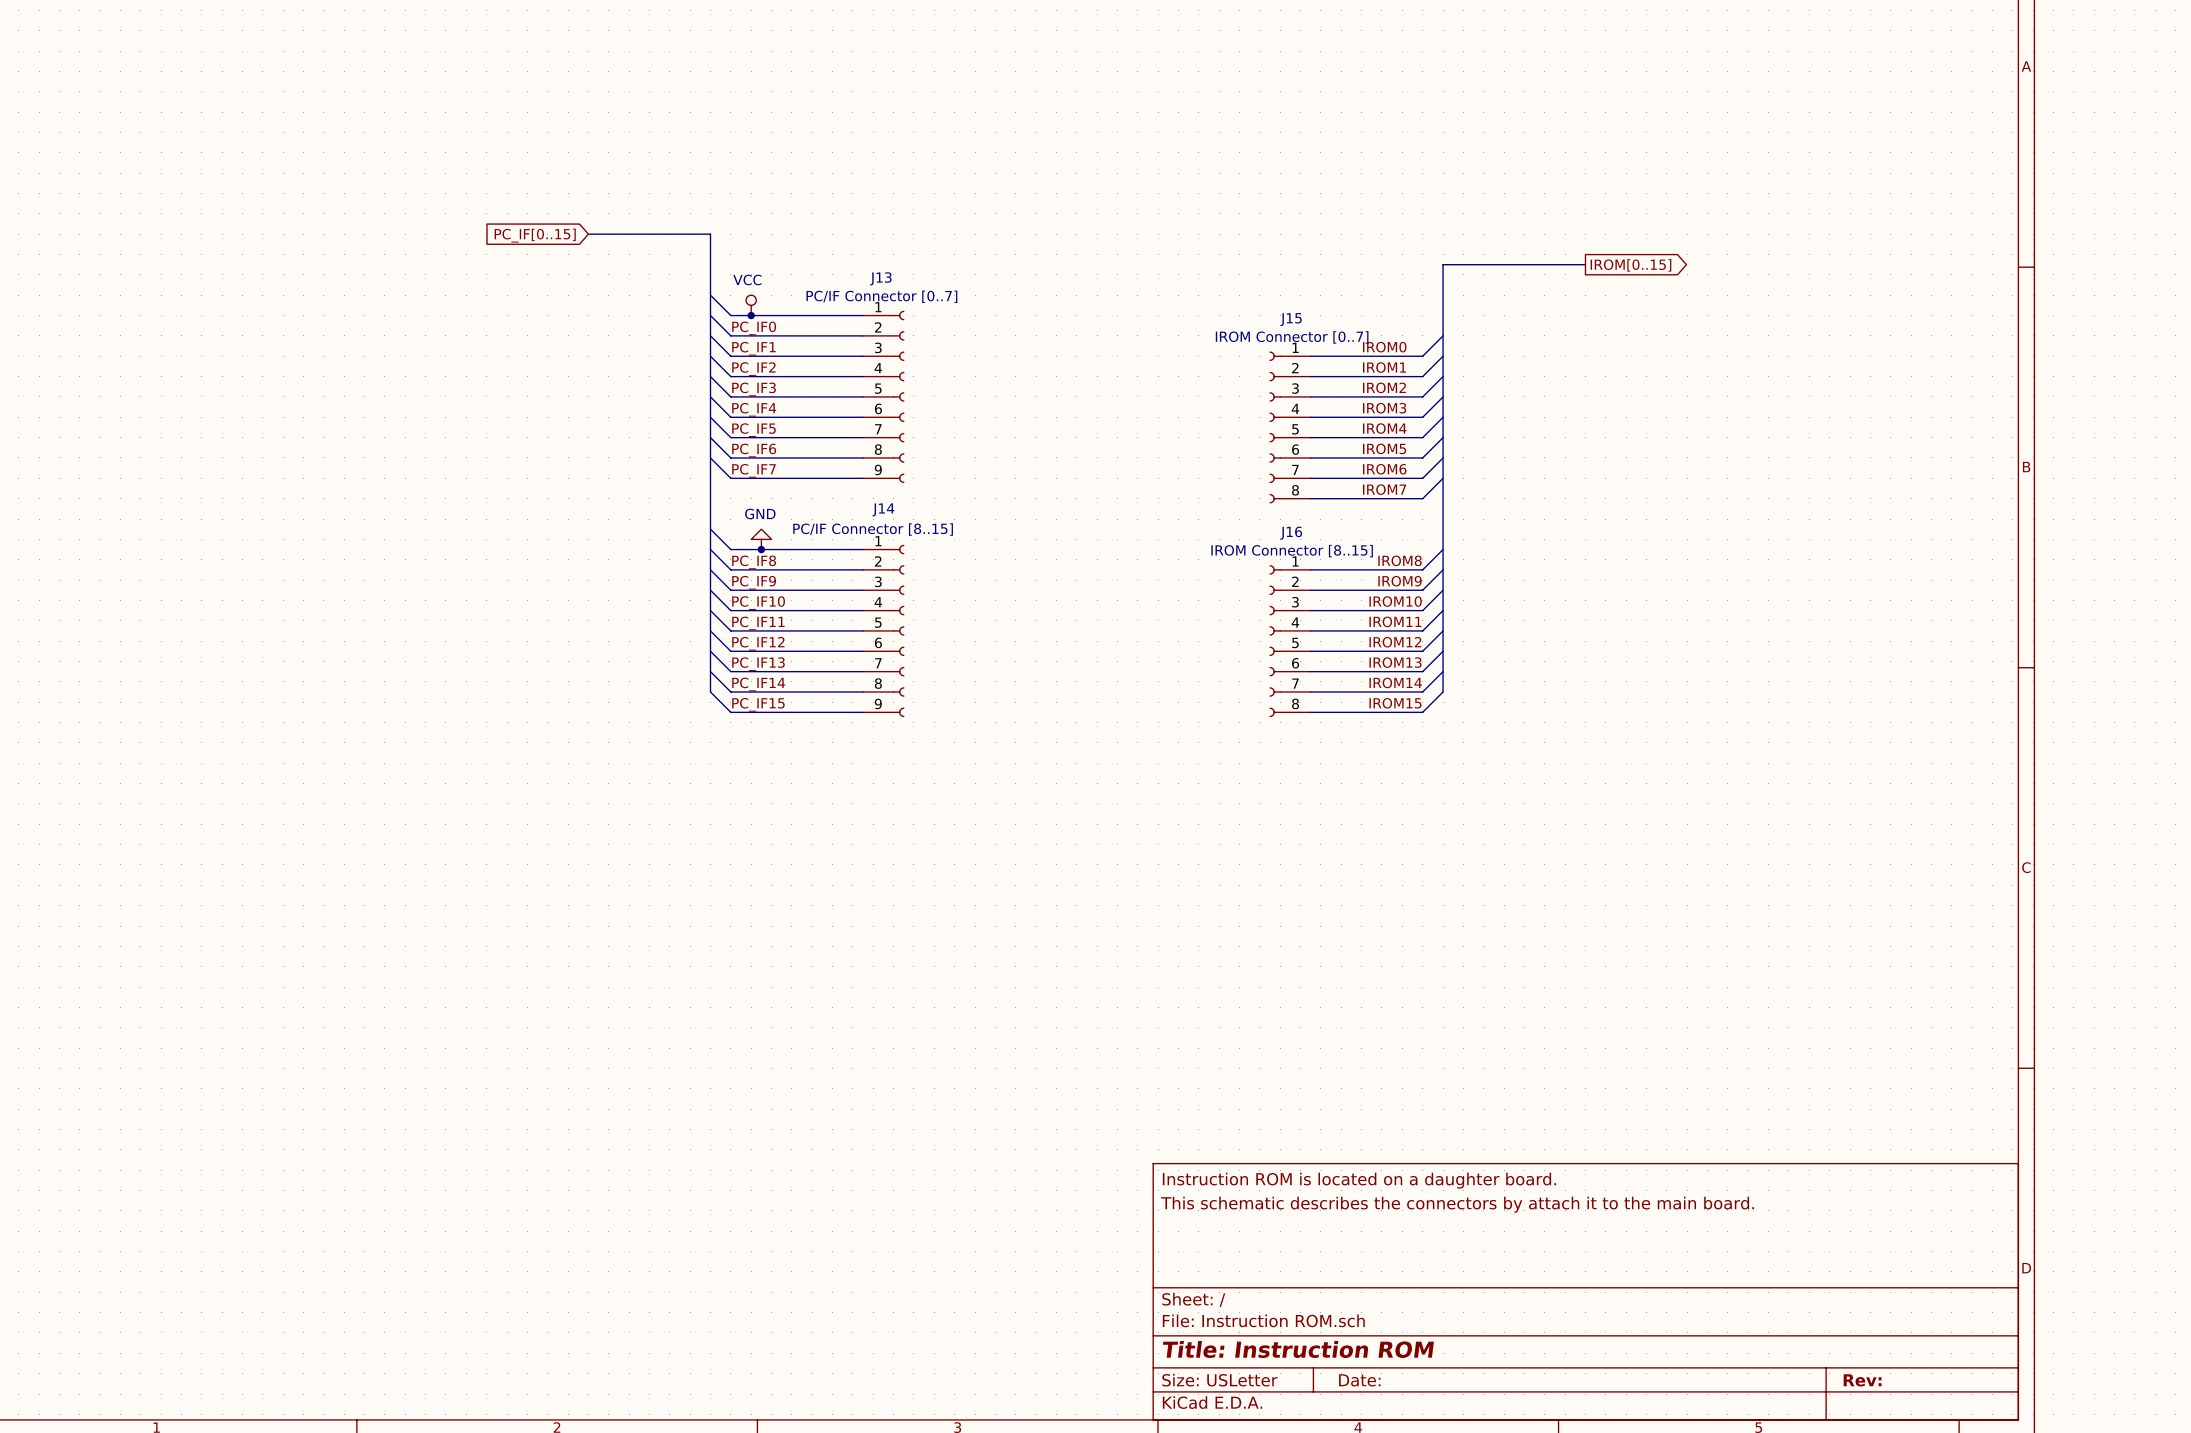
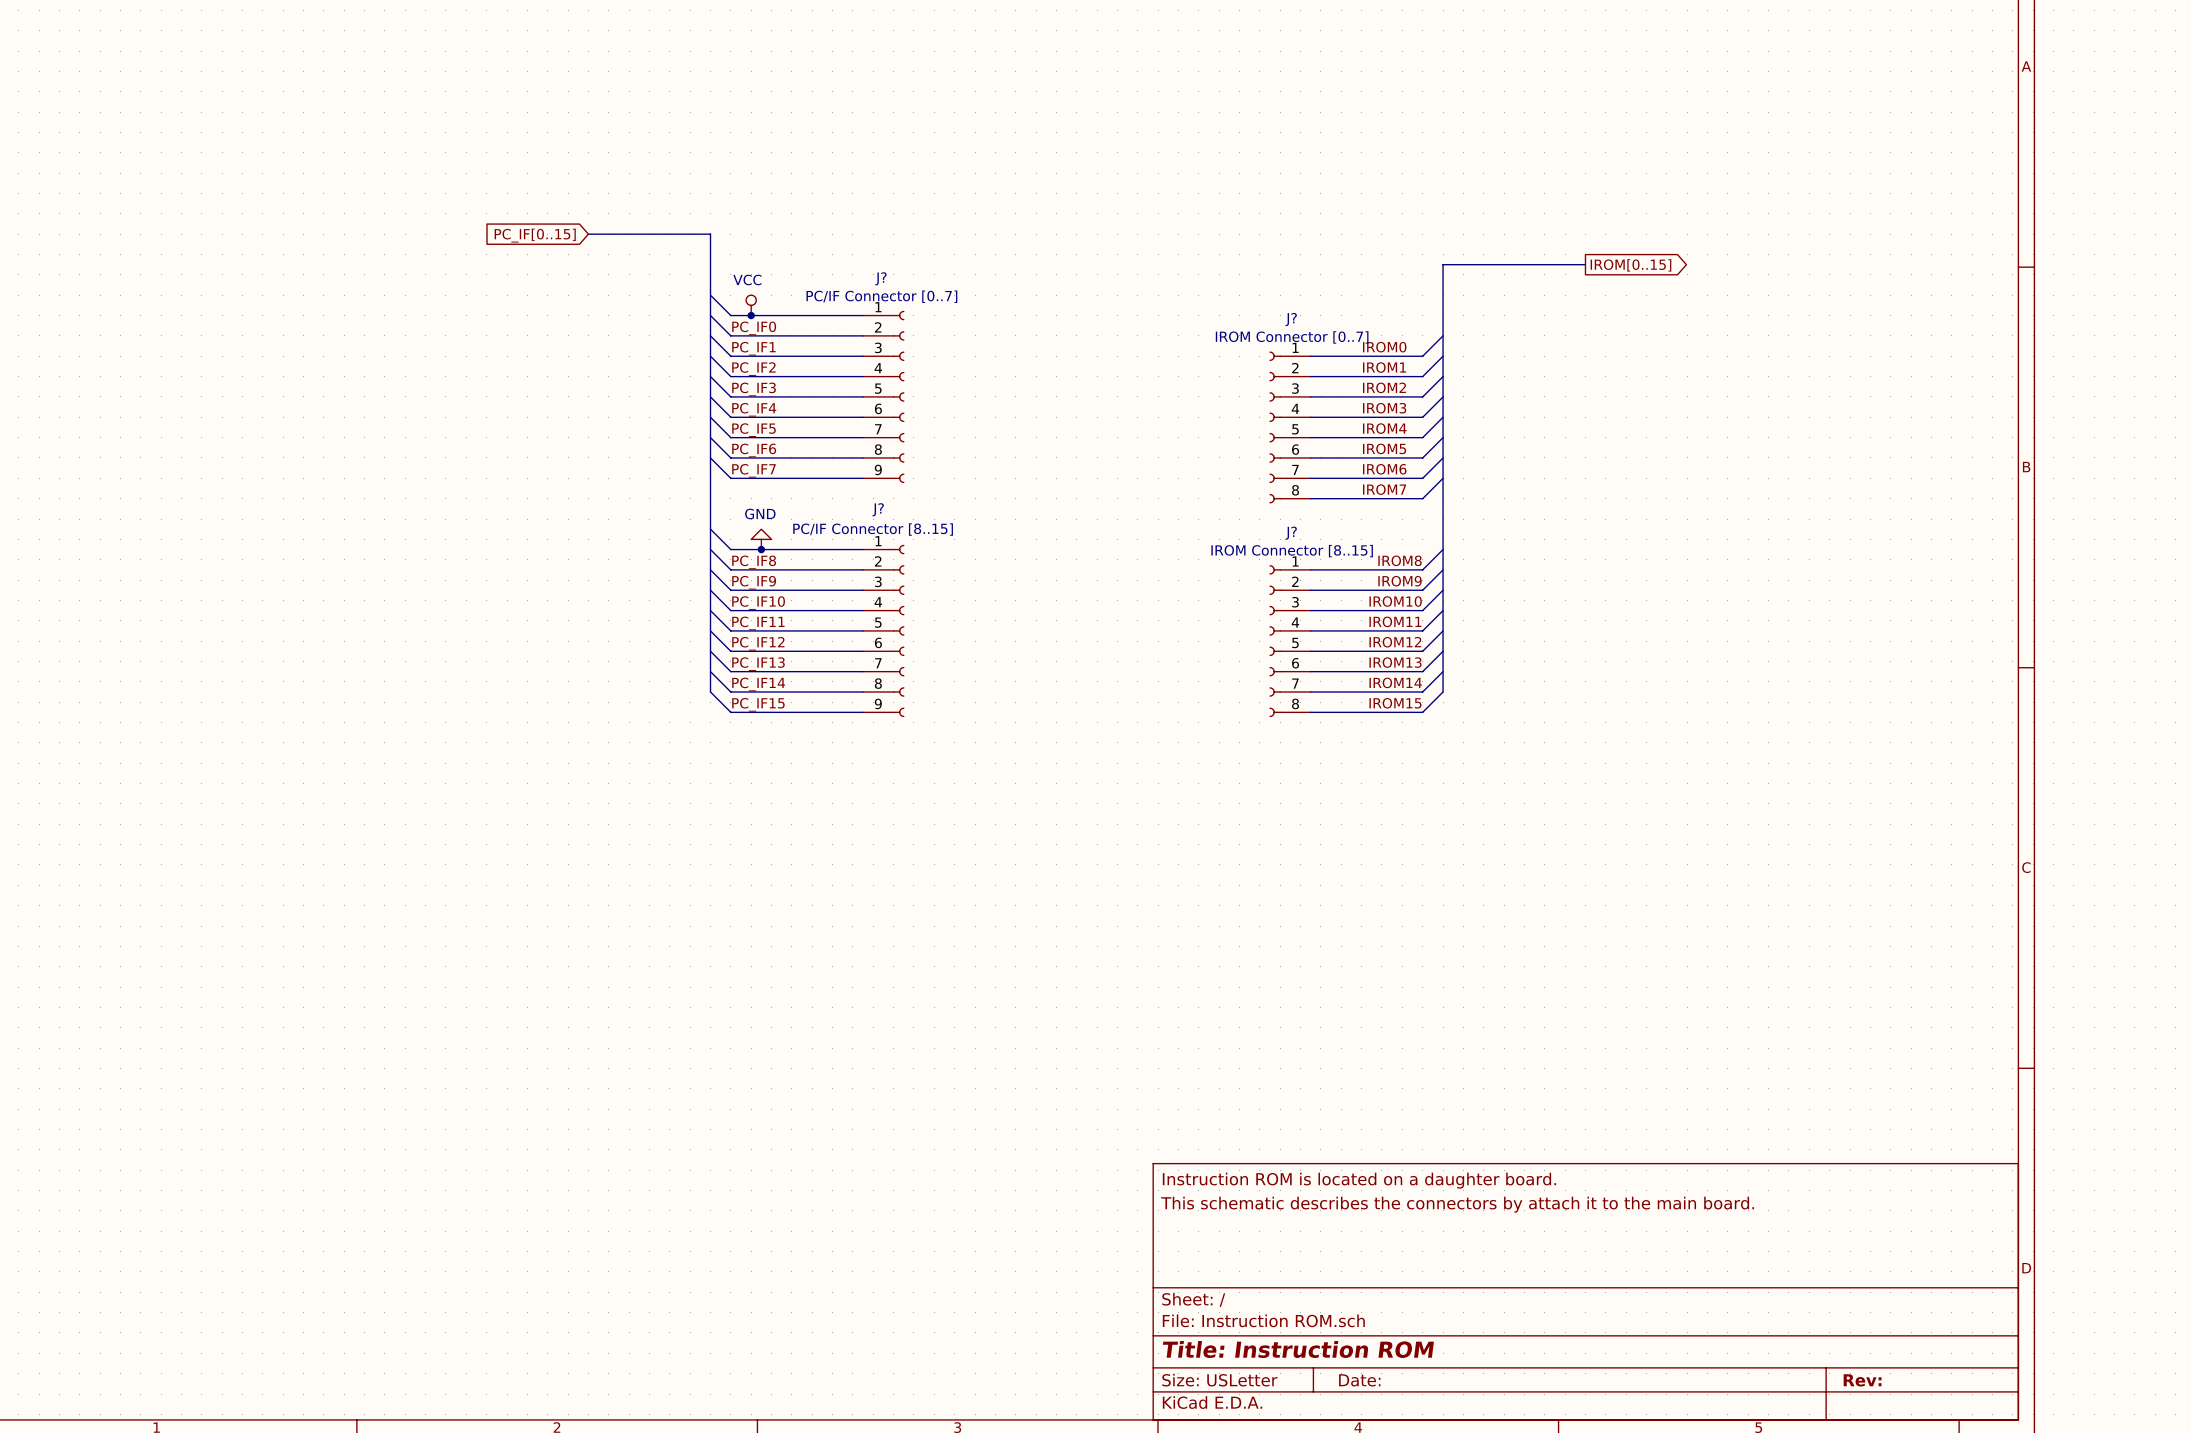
J13 name: J13 (880, 278) -> J? (880, 278)
J15 name: J15 (1291, 319) -> J? (1291, 319)
J14 name: J14 (883, 509) -> J? (878, 509)
J16 name: J16 (1291, 533) -> J? (1291, 533)

